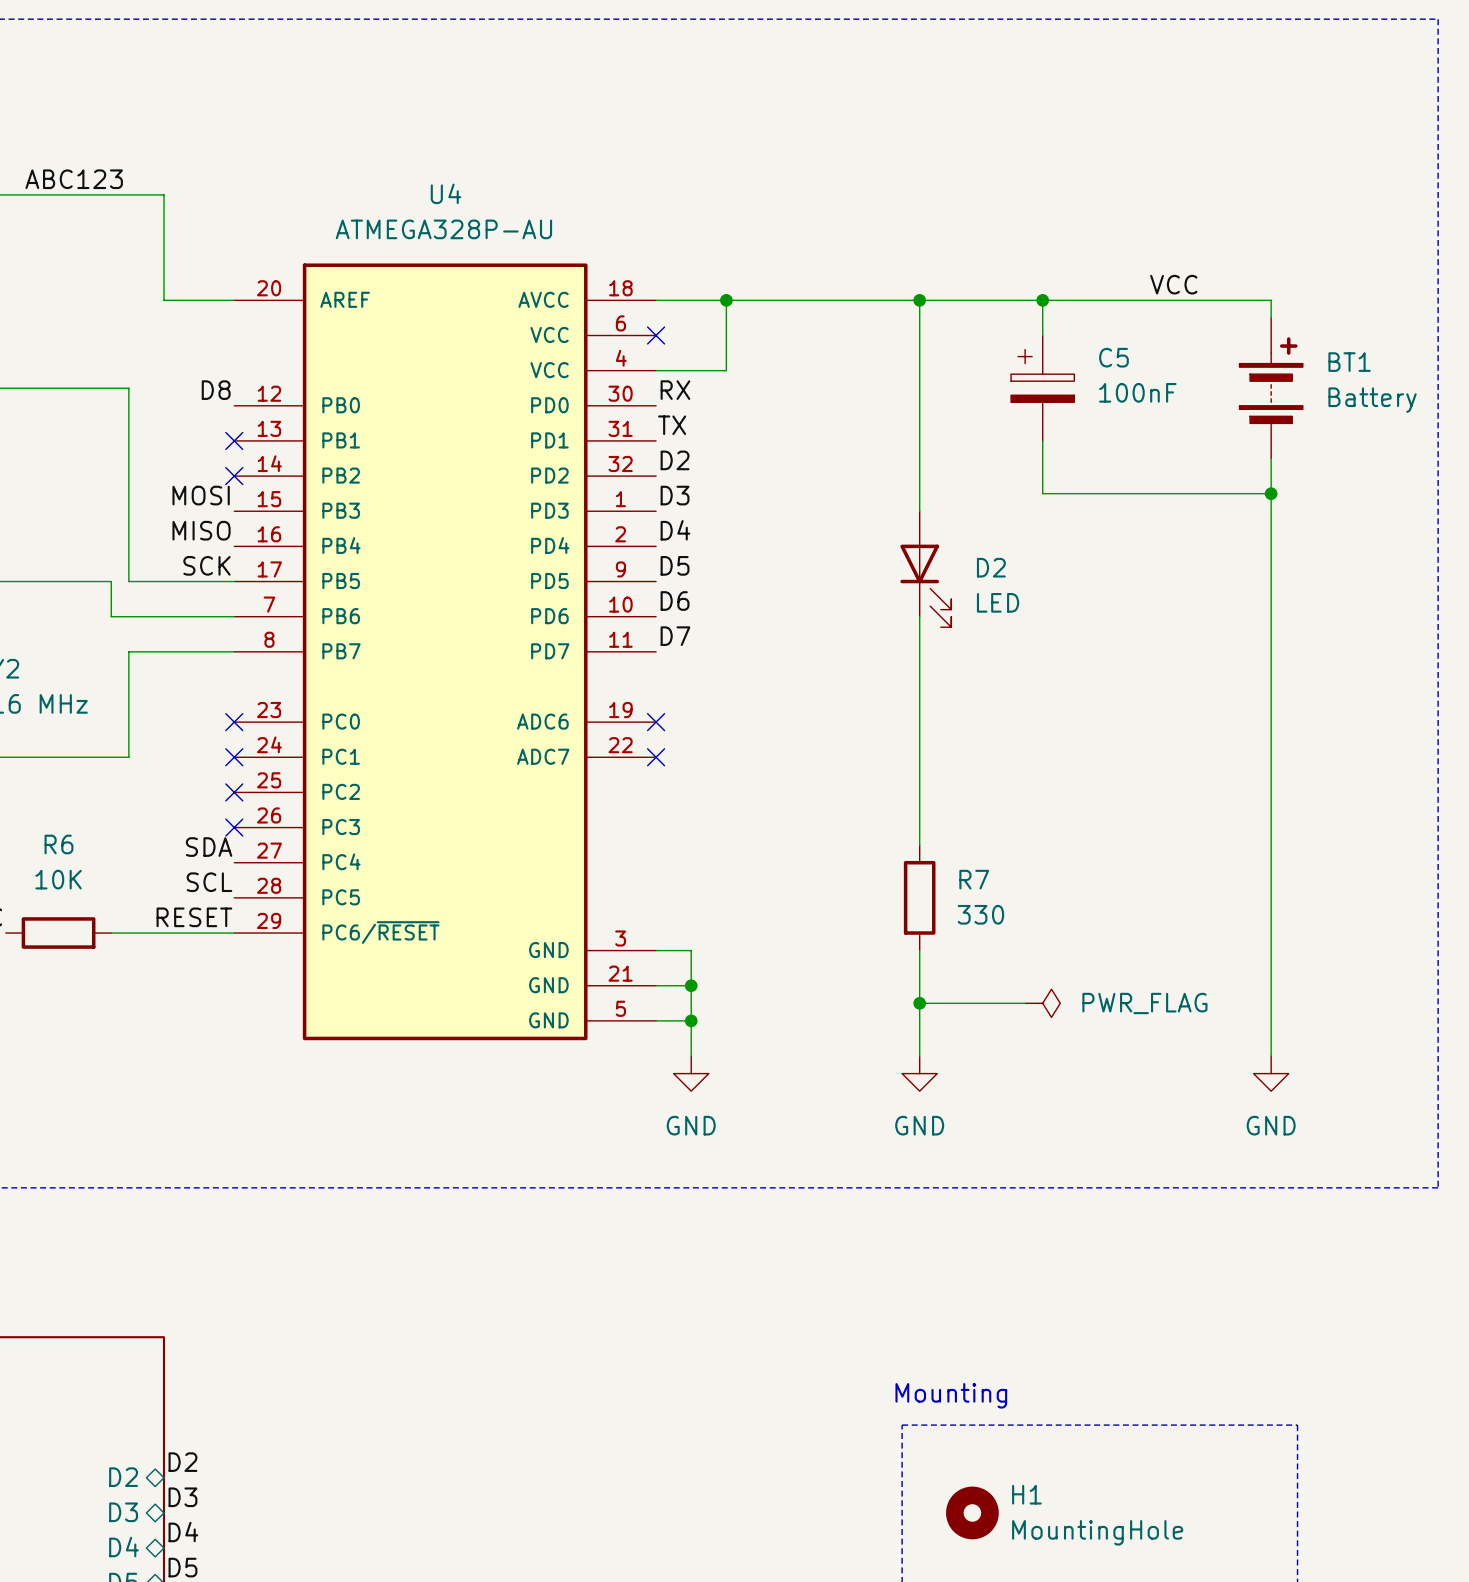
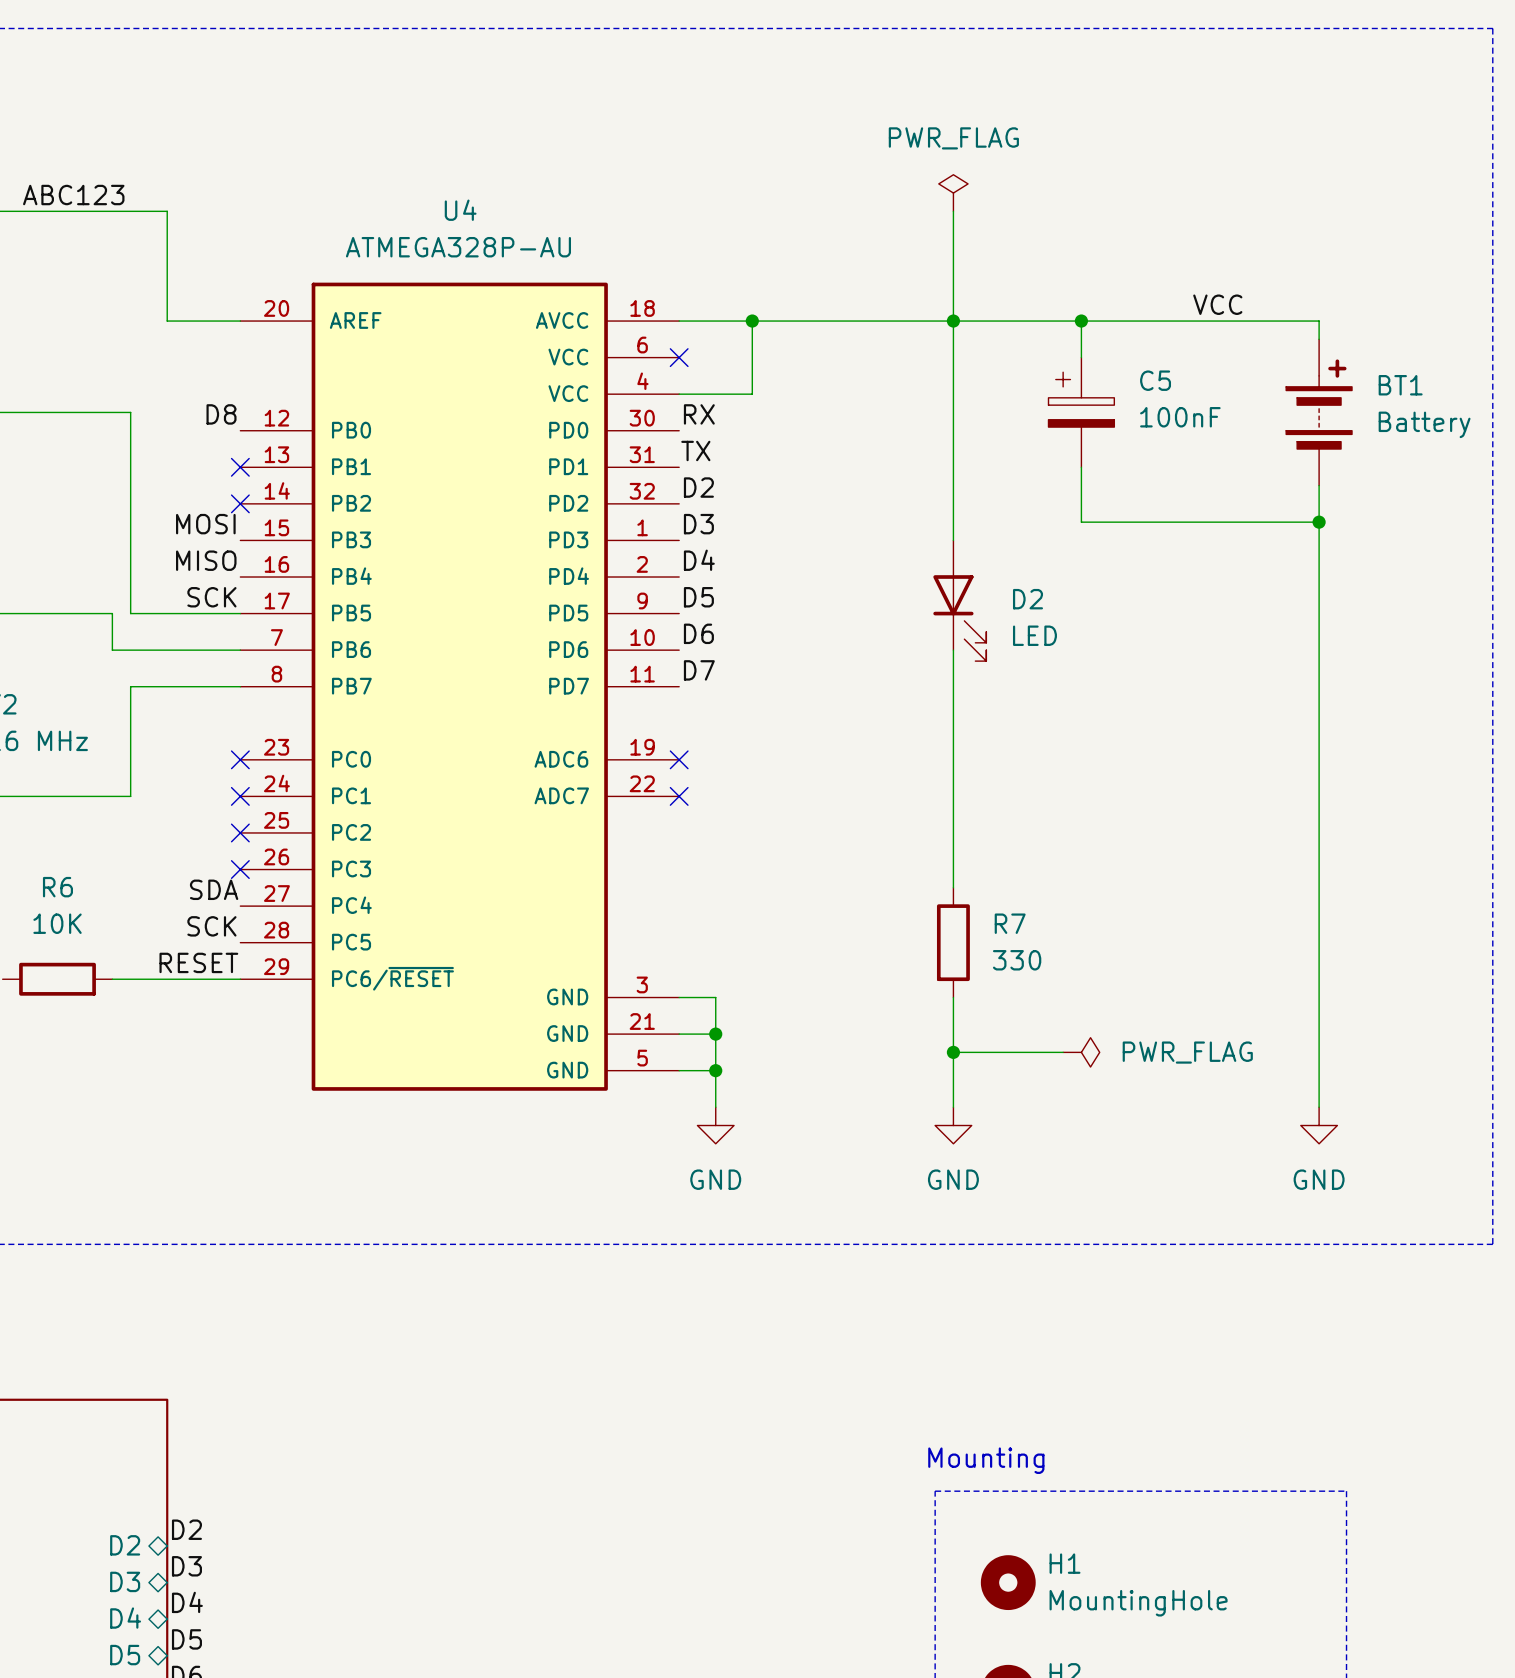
power symbol: none -> PWR_FLAG (953, 193)
wire: none -> (953, 211) (953, 321)
label: SCL (209, 882) -> SCK (211, 926)

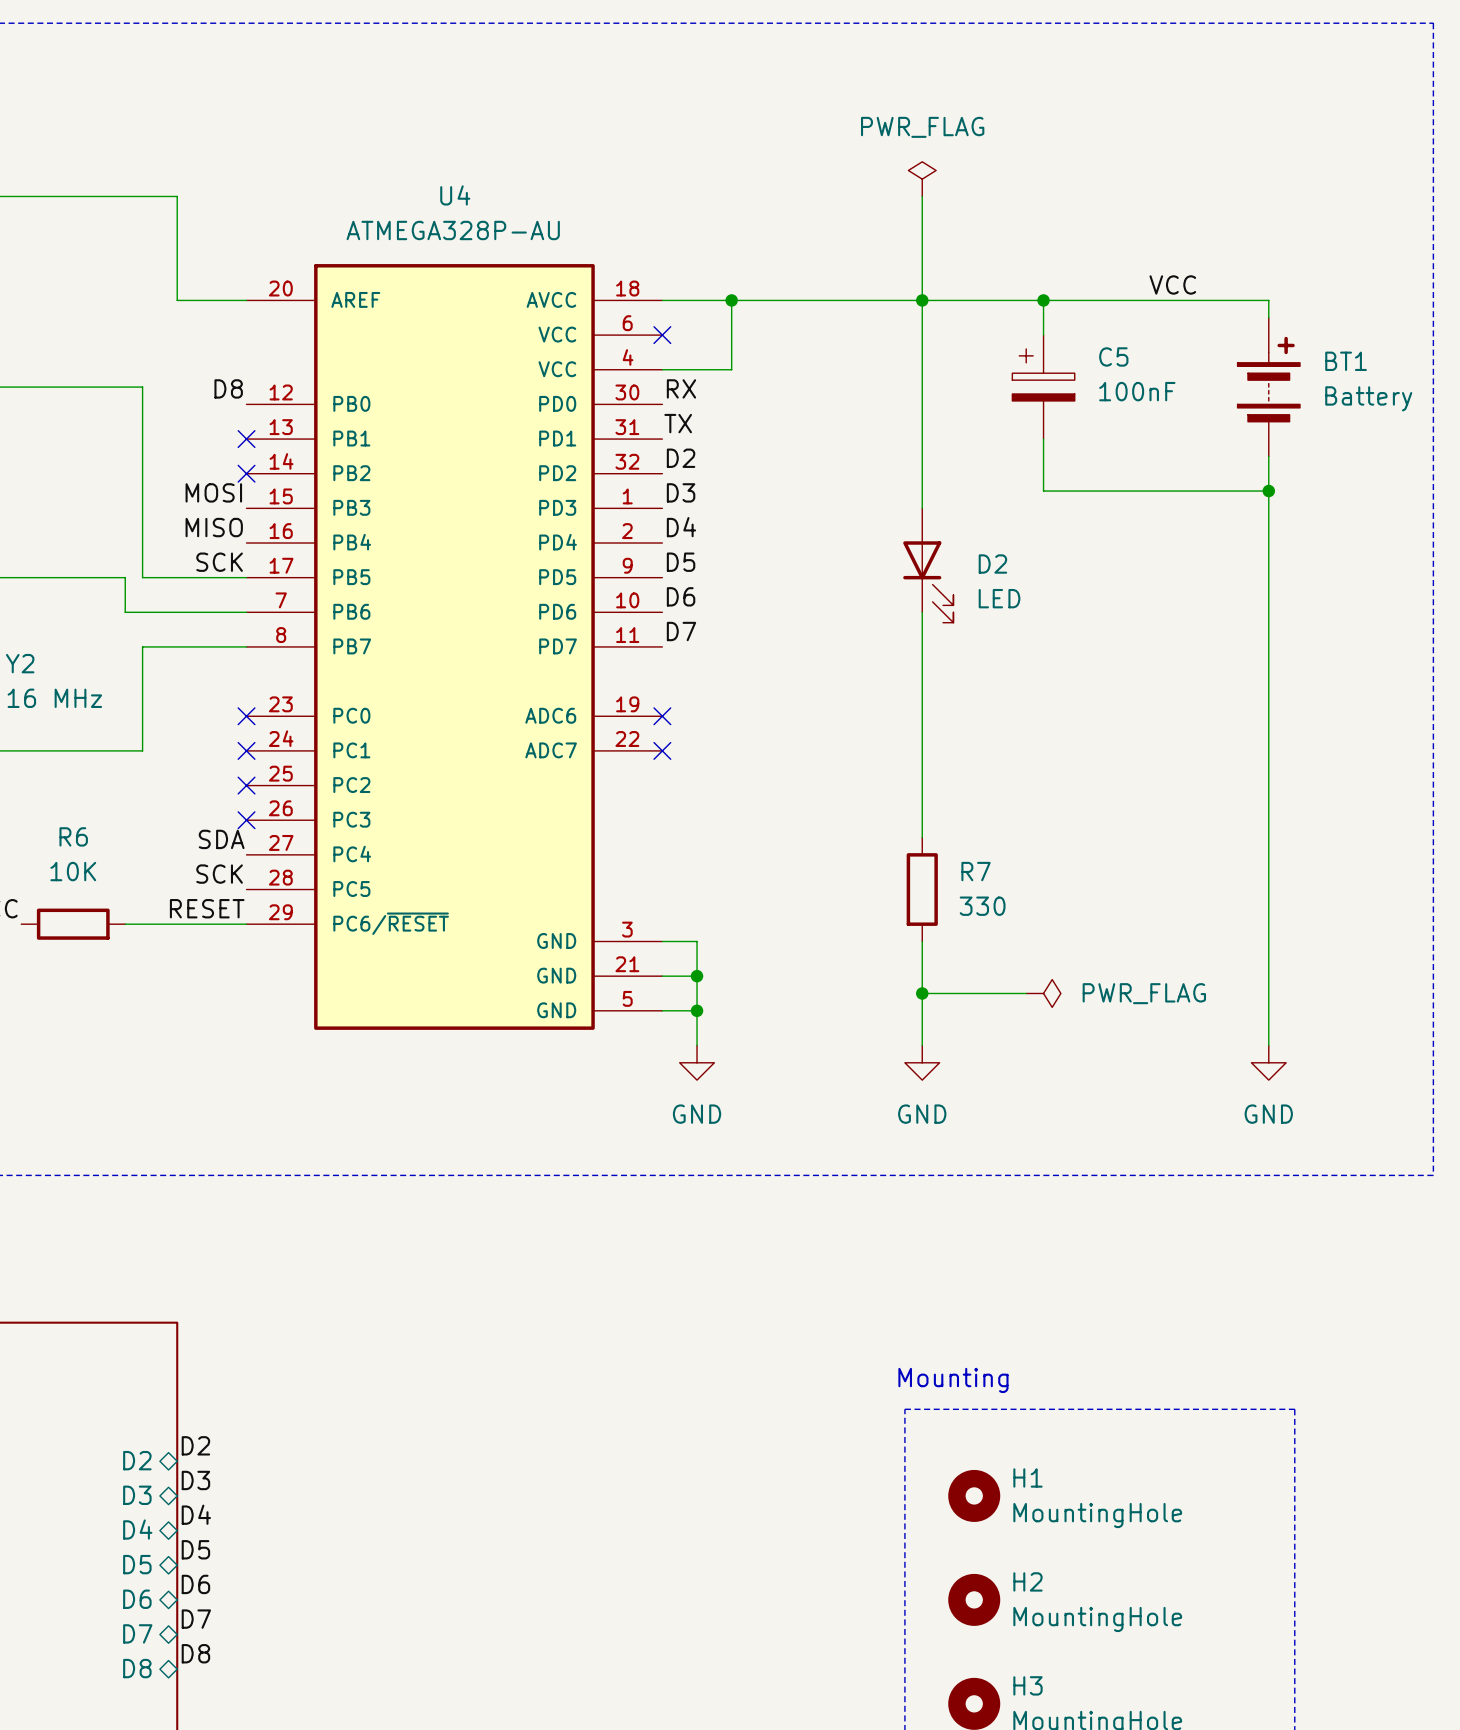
label: ABC123 (73, 195) -> none

